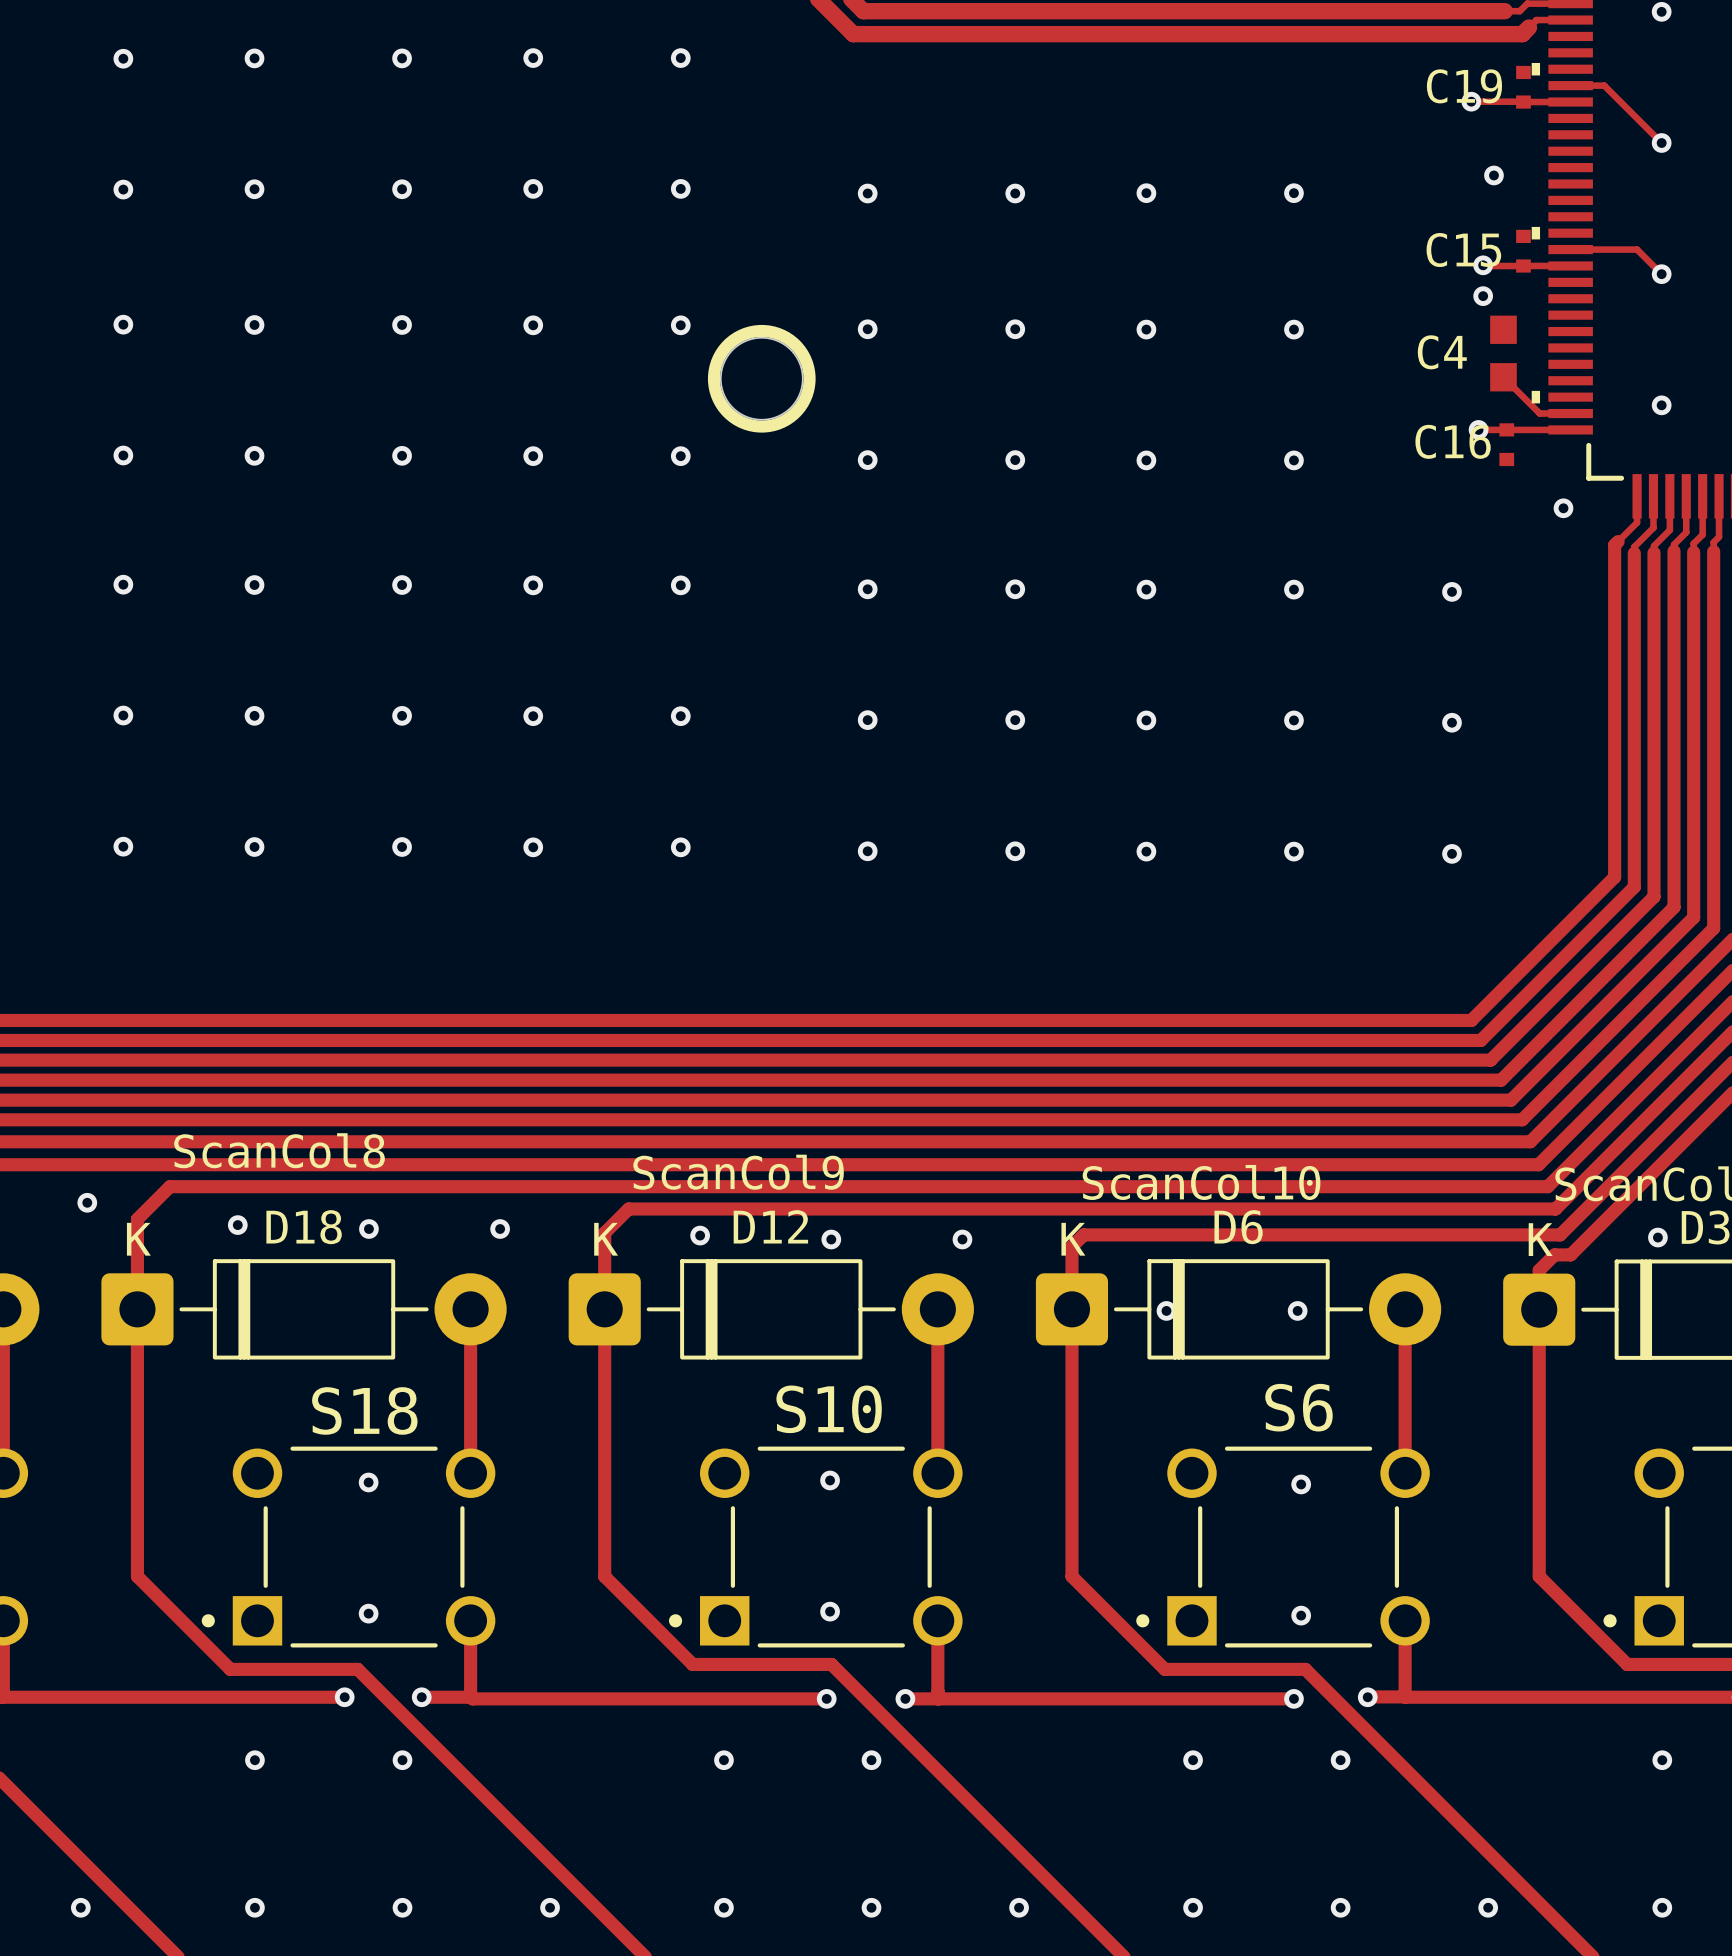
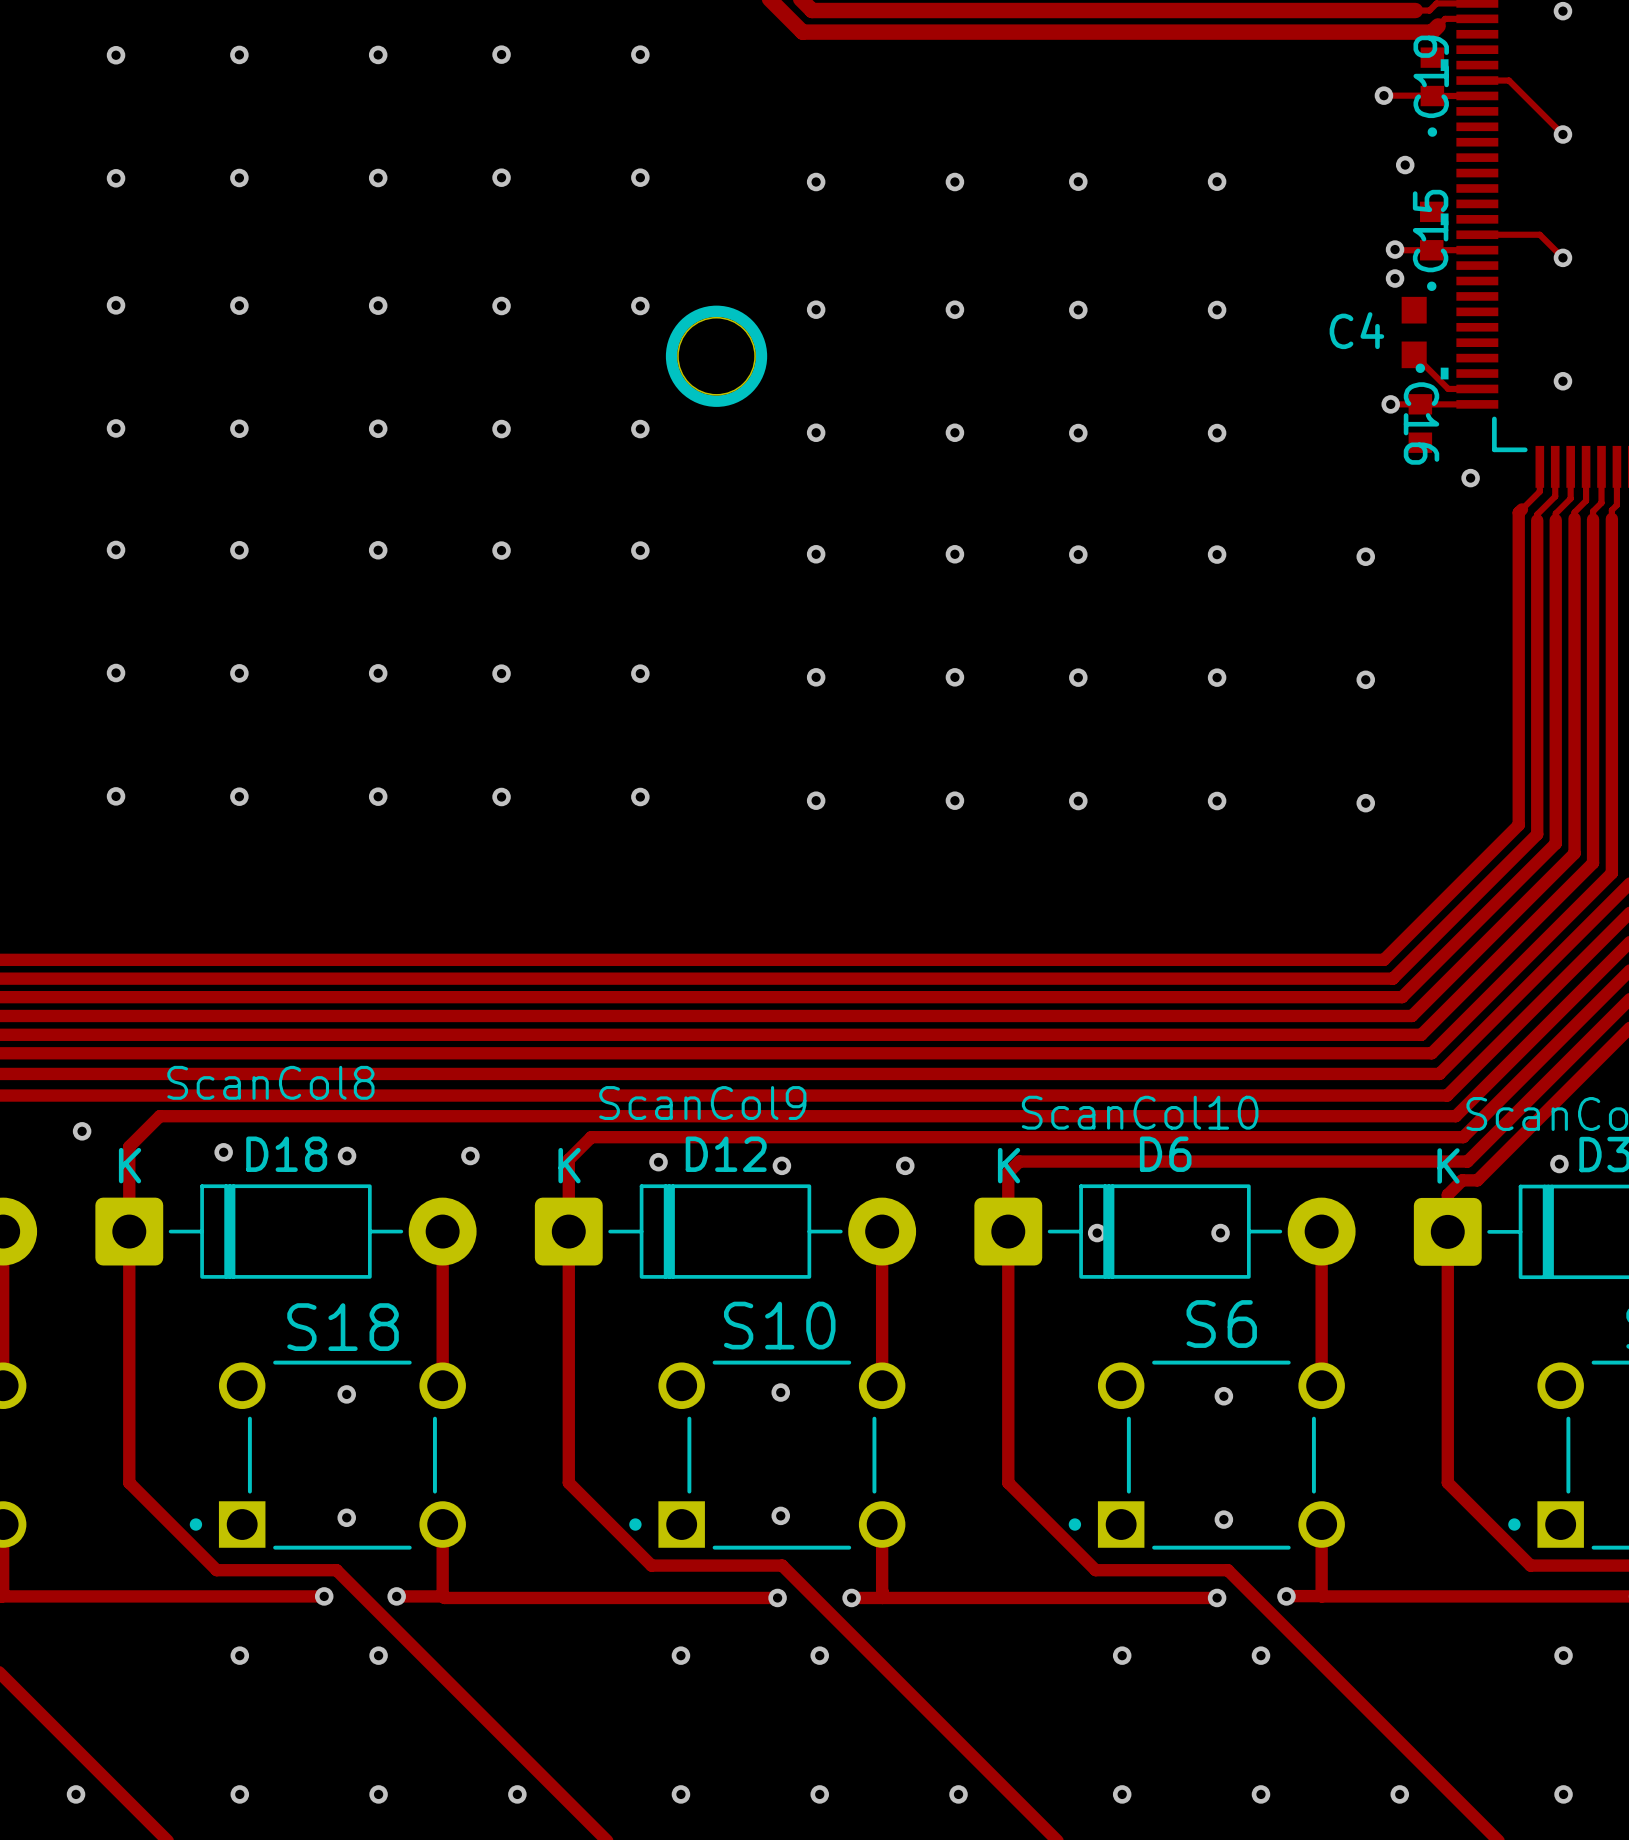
C19 footprint: [1516, 65, 1531, 109] -> [1420, 47, 1445, 137]
C15 footprint: [1516, 229, 1531, 273] -> [1420, 201, 1444, 291]
C16 footprint: [1499, 423, 1515, 467] -> [1408, 363, 1433, 453]

